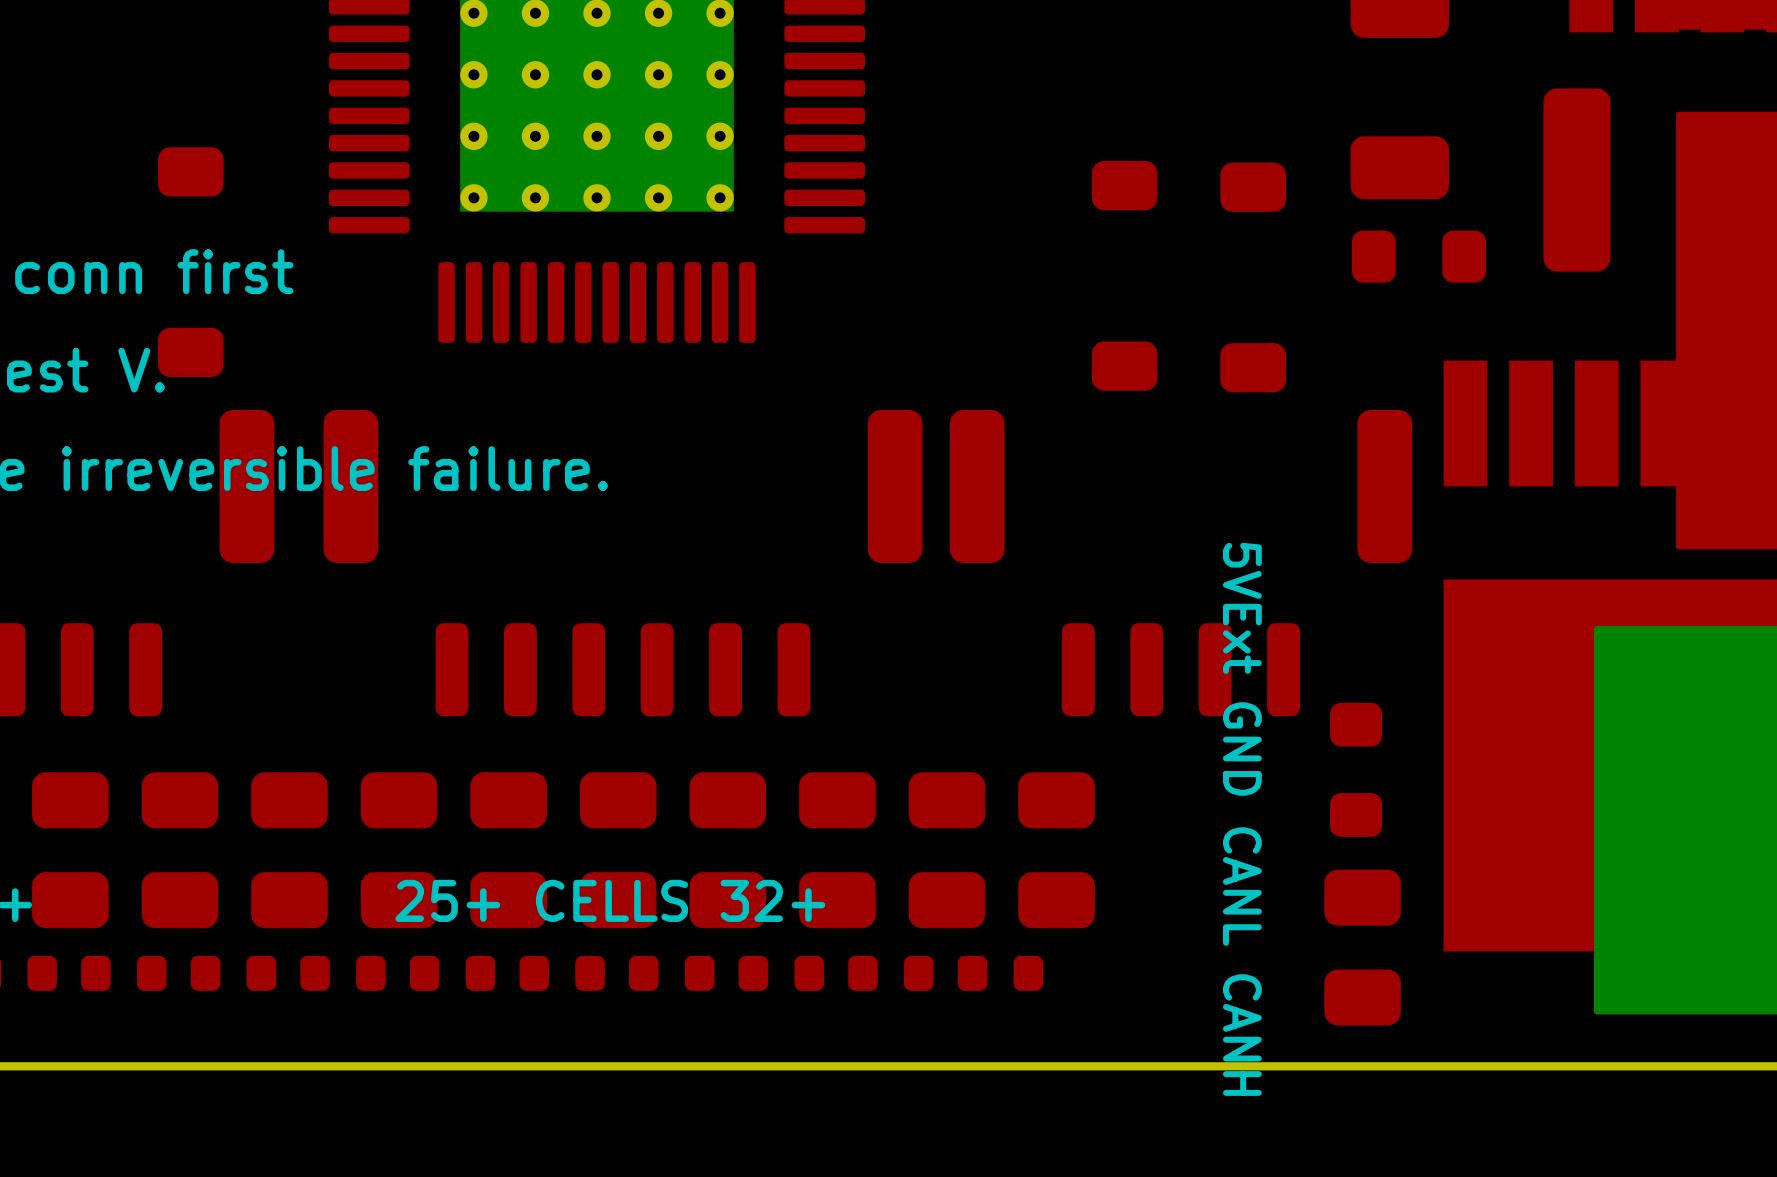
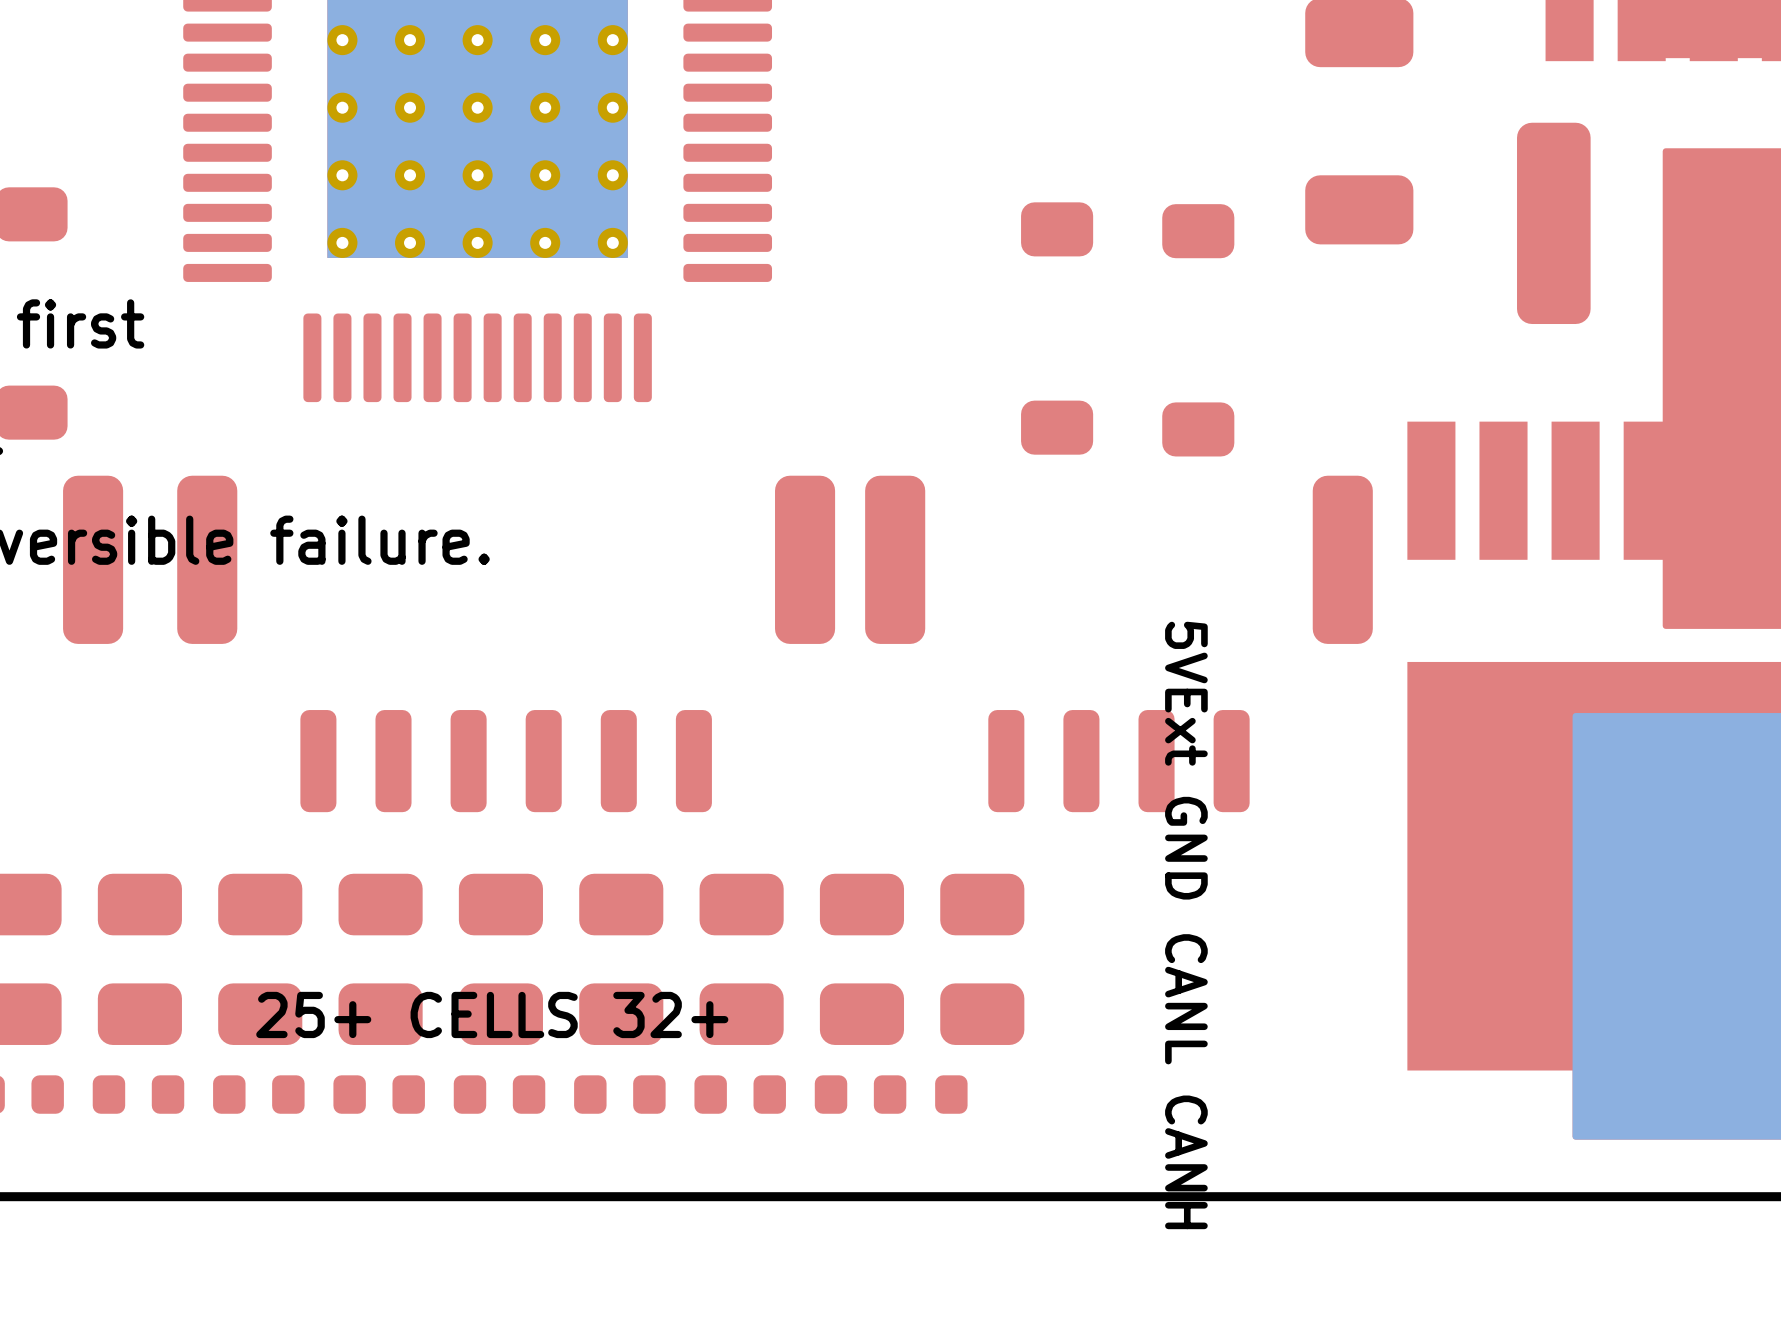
part: (1418, 256) -> none
part: (1356, 769) -> none
part: (1362, 947) -> none

